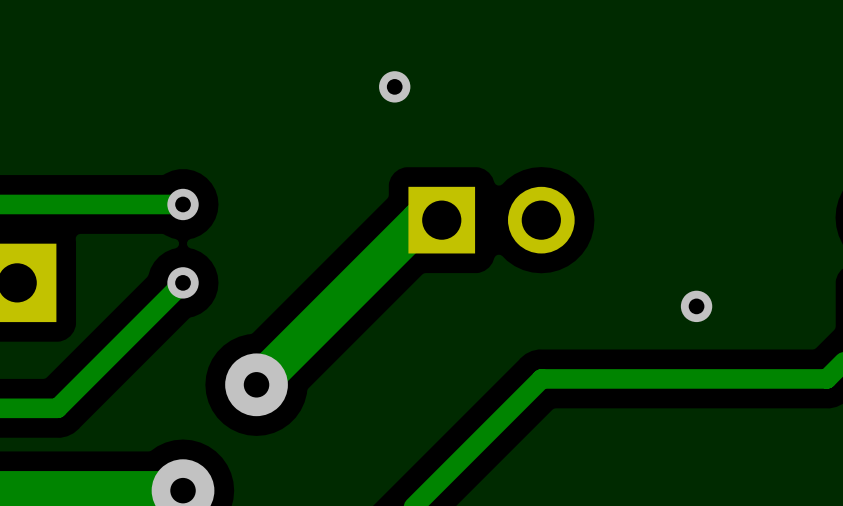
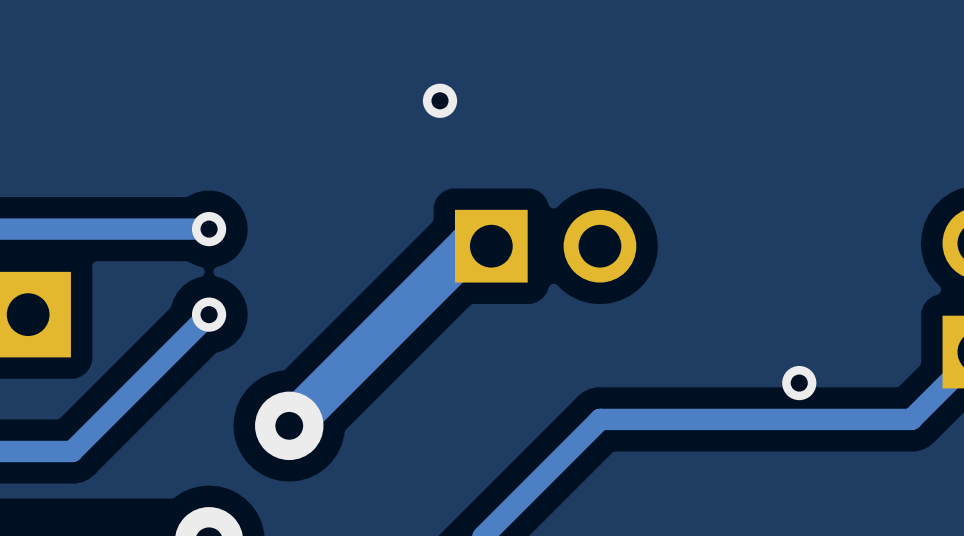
via position: (696, 306) -> (799, 383)

